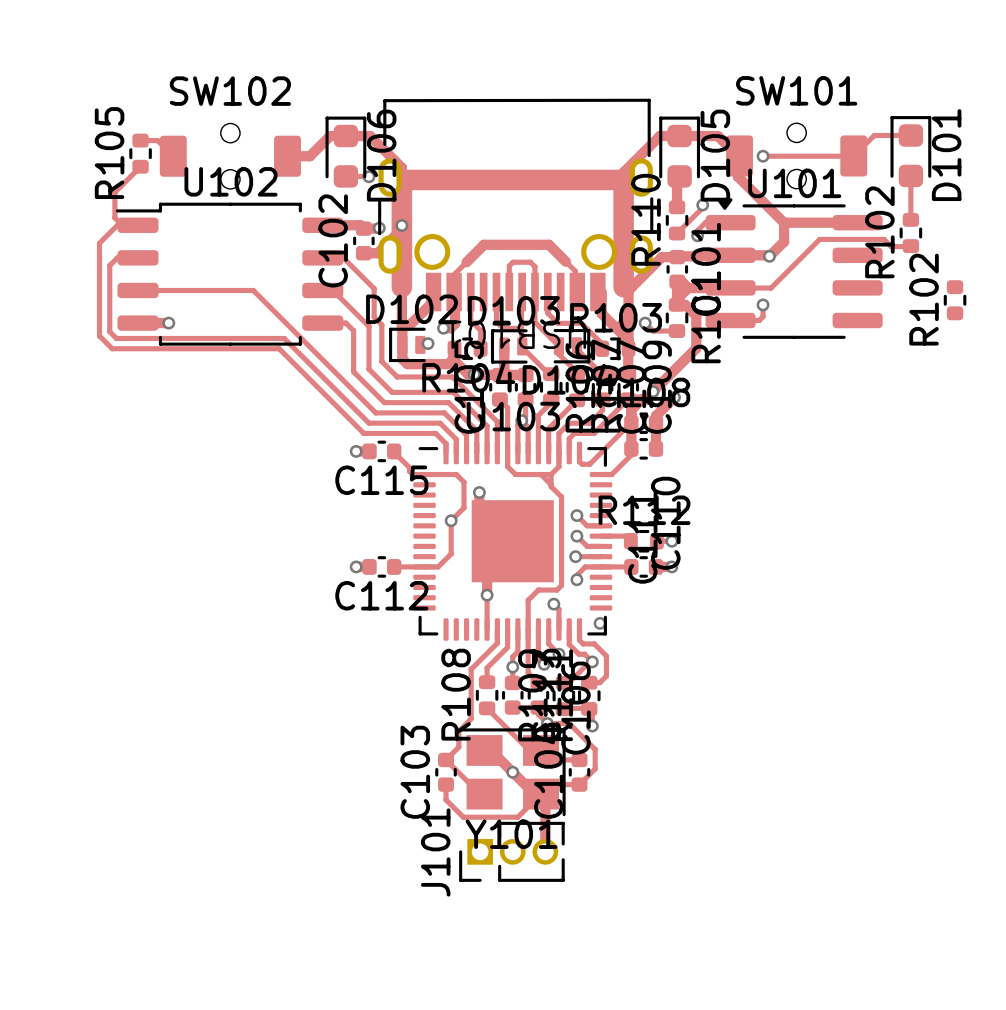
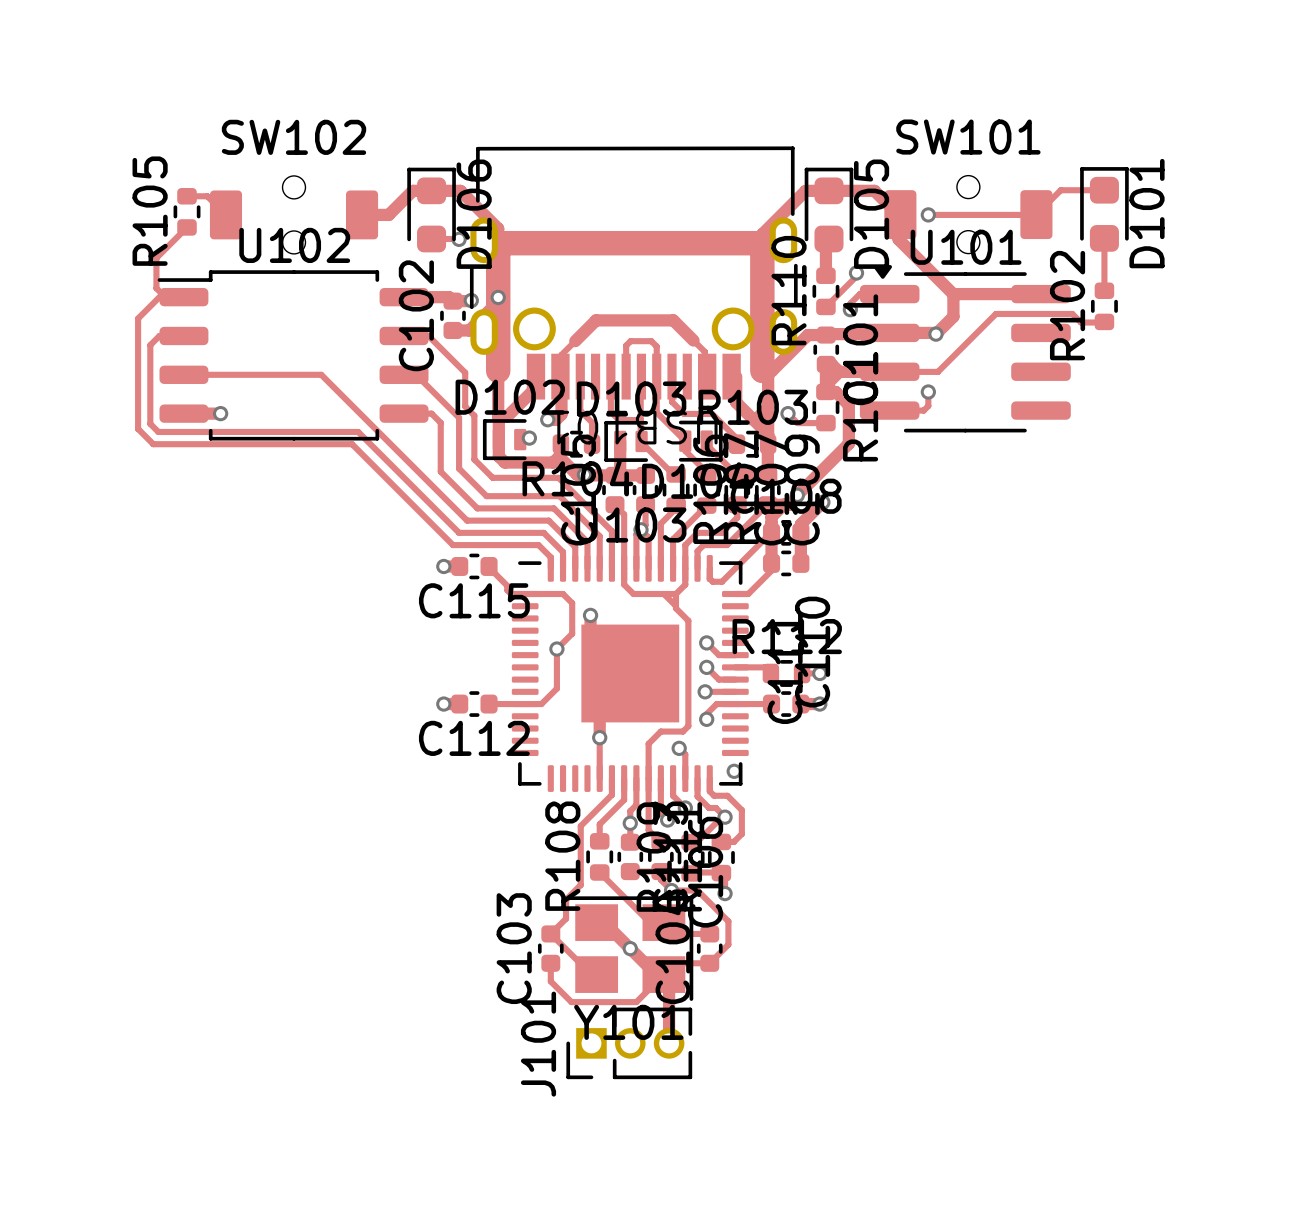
R102: (955, 300) -> none

